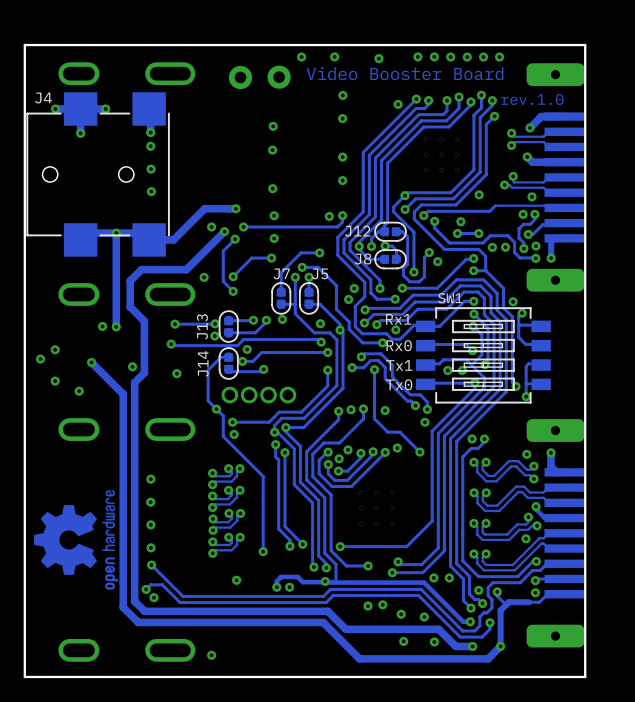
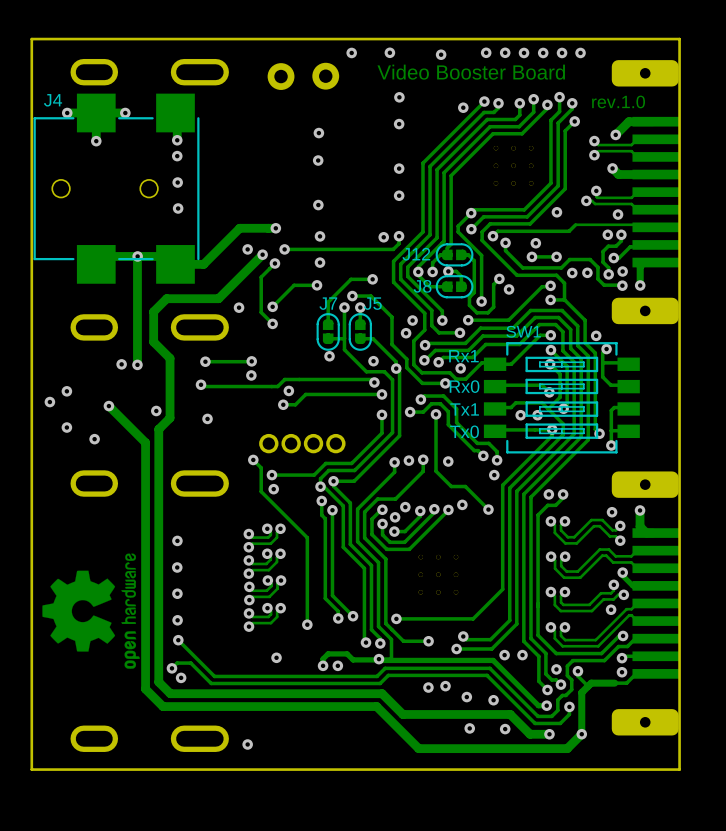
track: (253, 320) (228, 320) -> none
via: (253, 320) -> none
track: (266, 320) (255, 332) (228, 332) -> none
via: (266, 320) -> none
J13: (228, 326) -> none
track: (228, 357) (221, 357) (208, 370) (208, 400) (216, 409) -> none
J14: (228, 363) -> none
track: (263, 369) (261, 371) (230, 371) (228, 369) -> none
via: (263, 369) -> none

